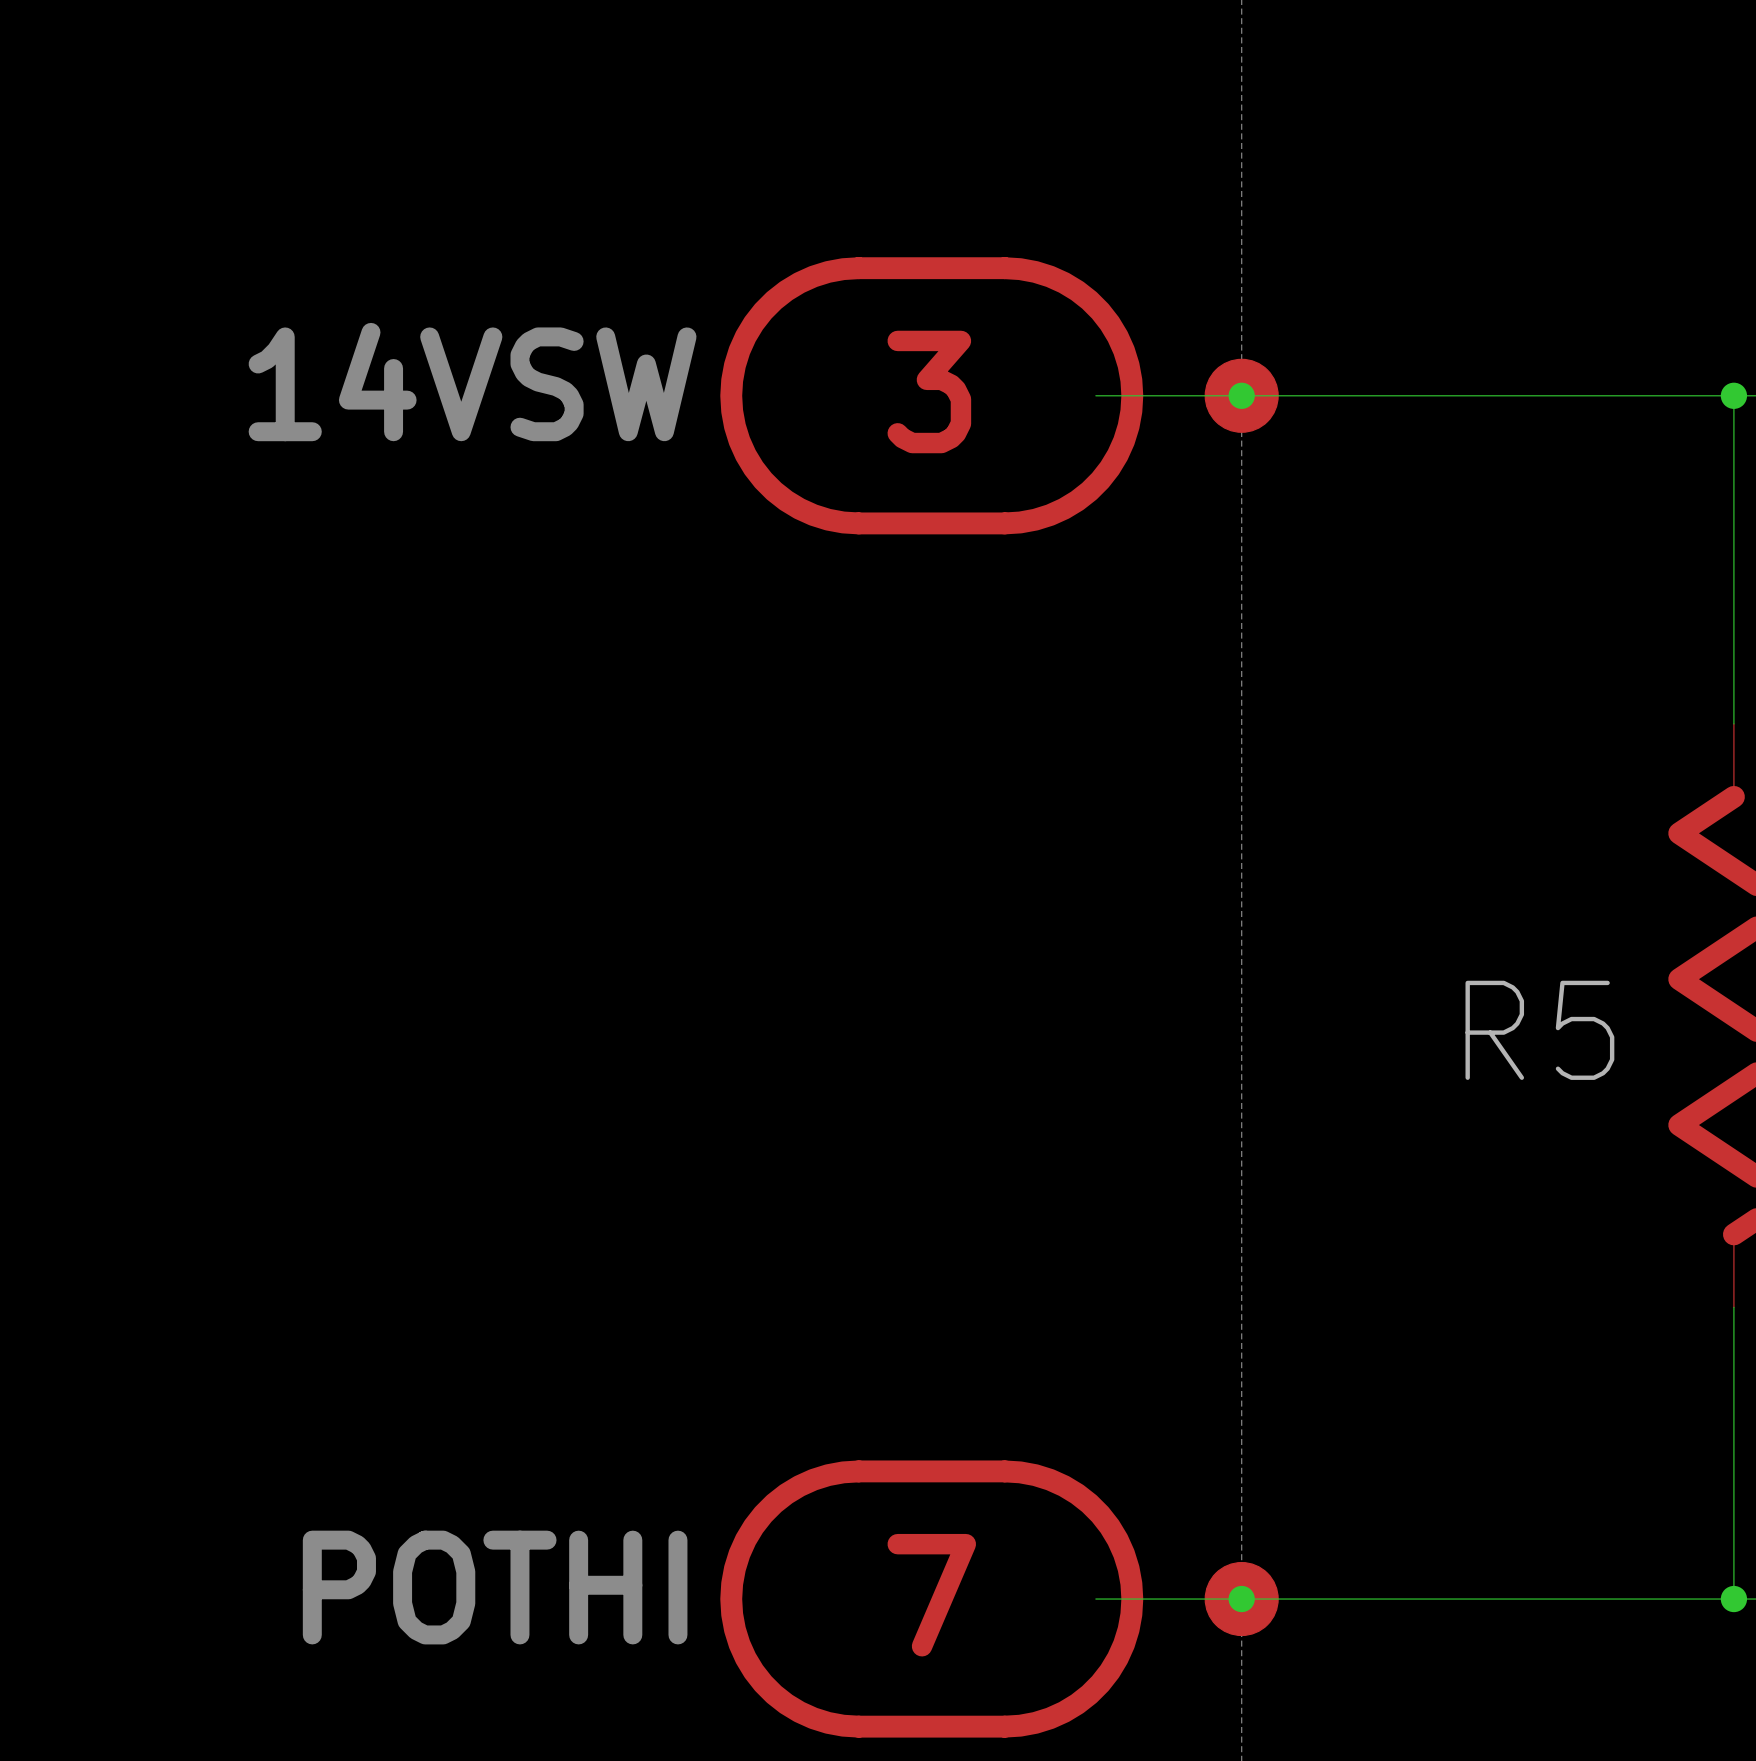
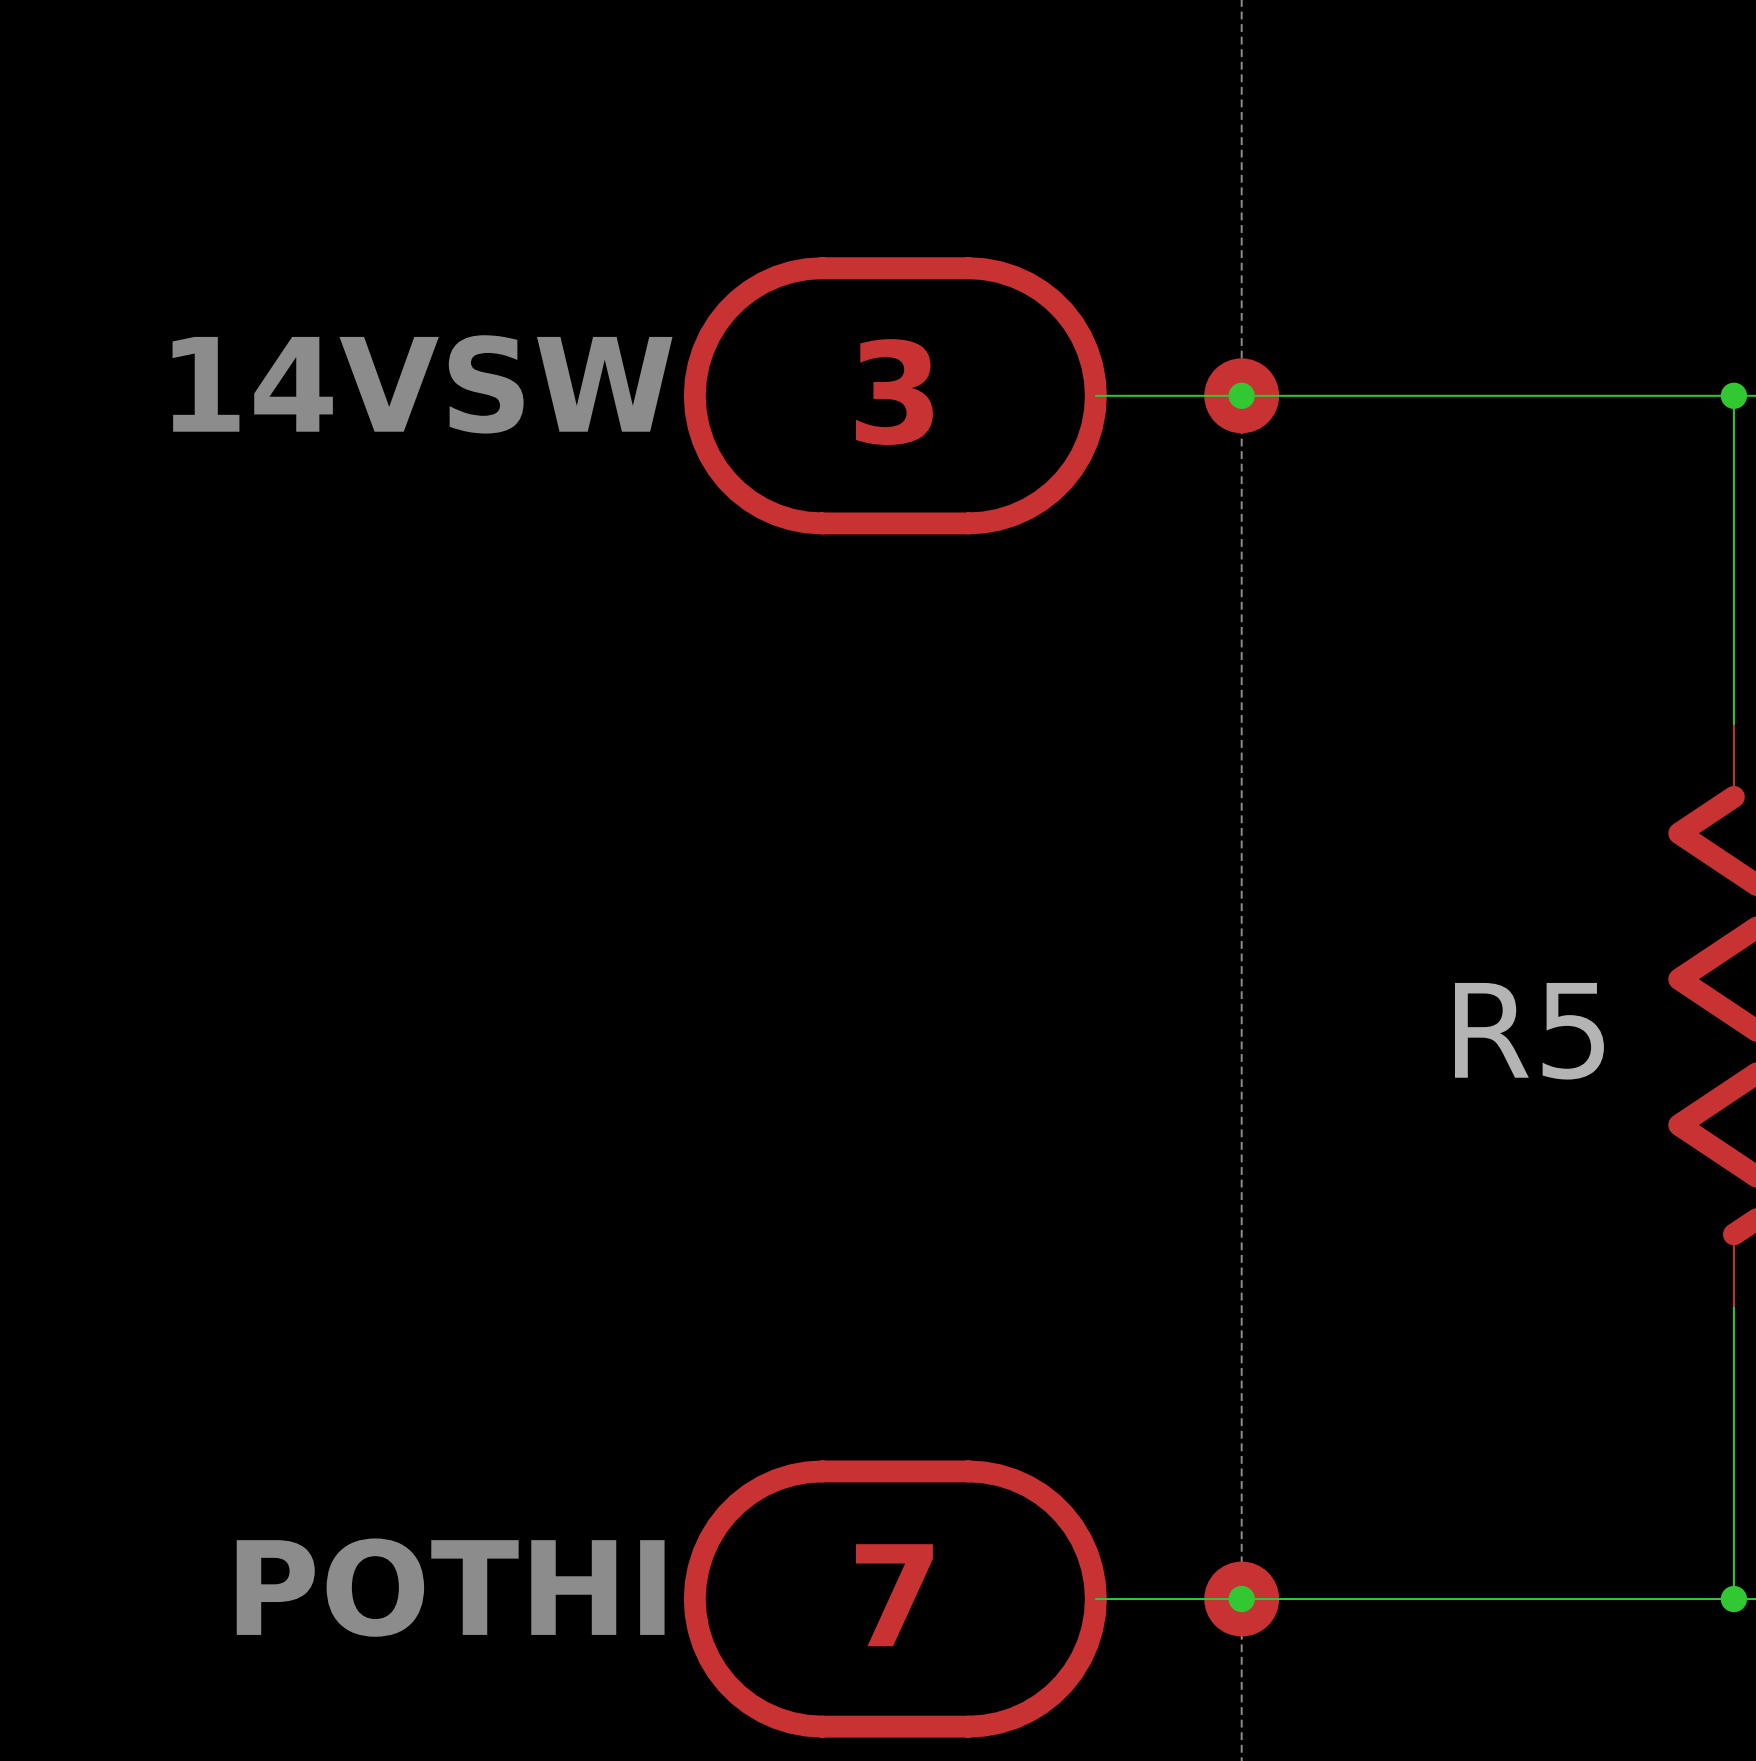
text position: 14VSW (472, 382) -> 14VSW (422, 384)
part position: (931, 395) -> (895, 395)
text position: POTHI (495, 1587) -> POTHI (450, 1587)
part position: (931, 1599) -> (895, 1599)

